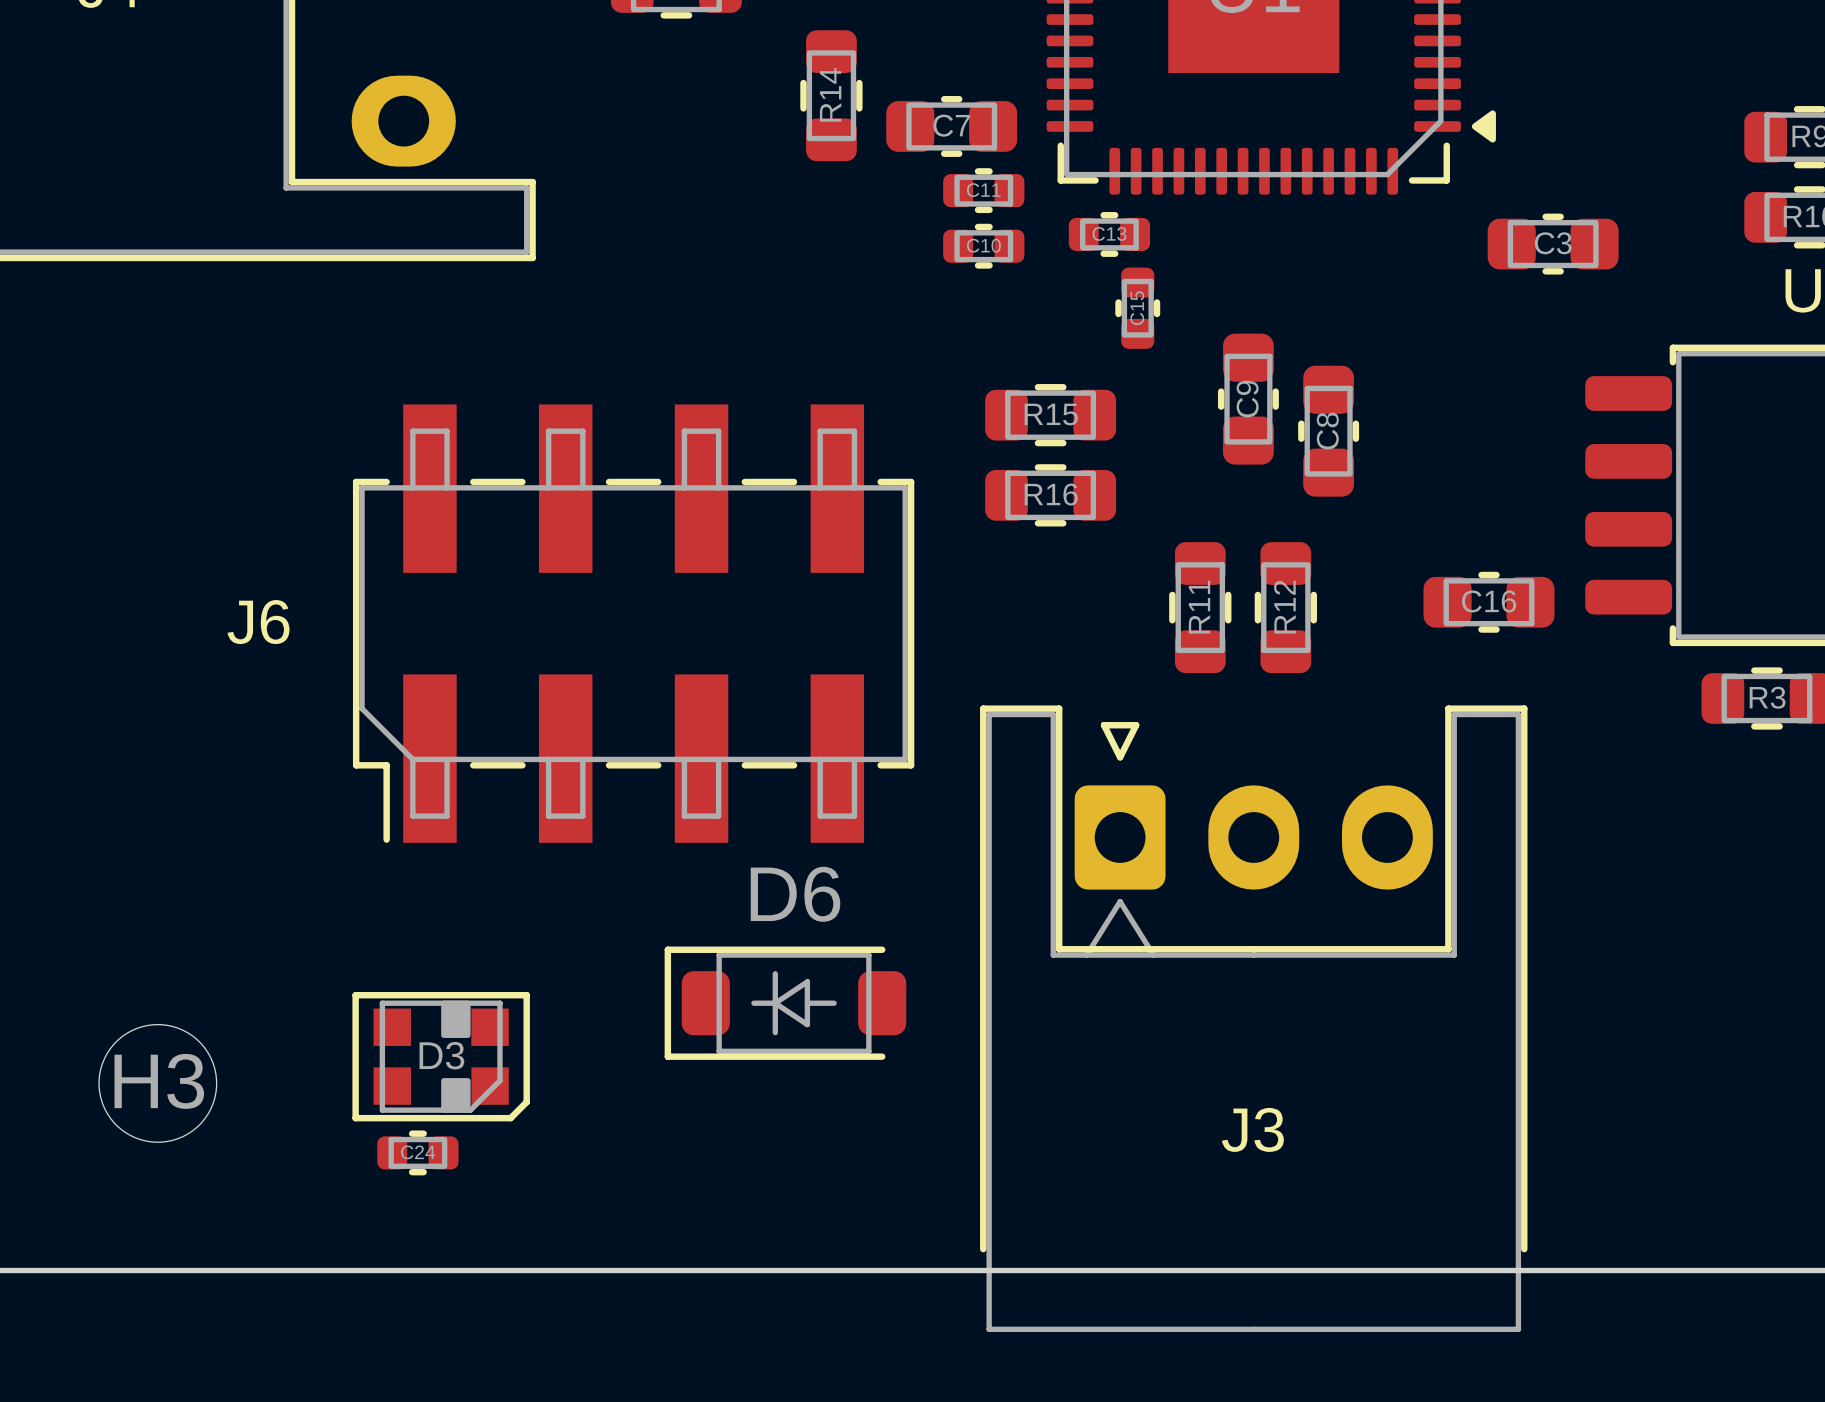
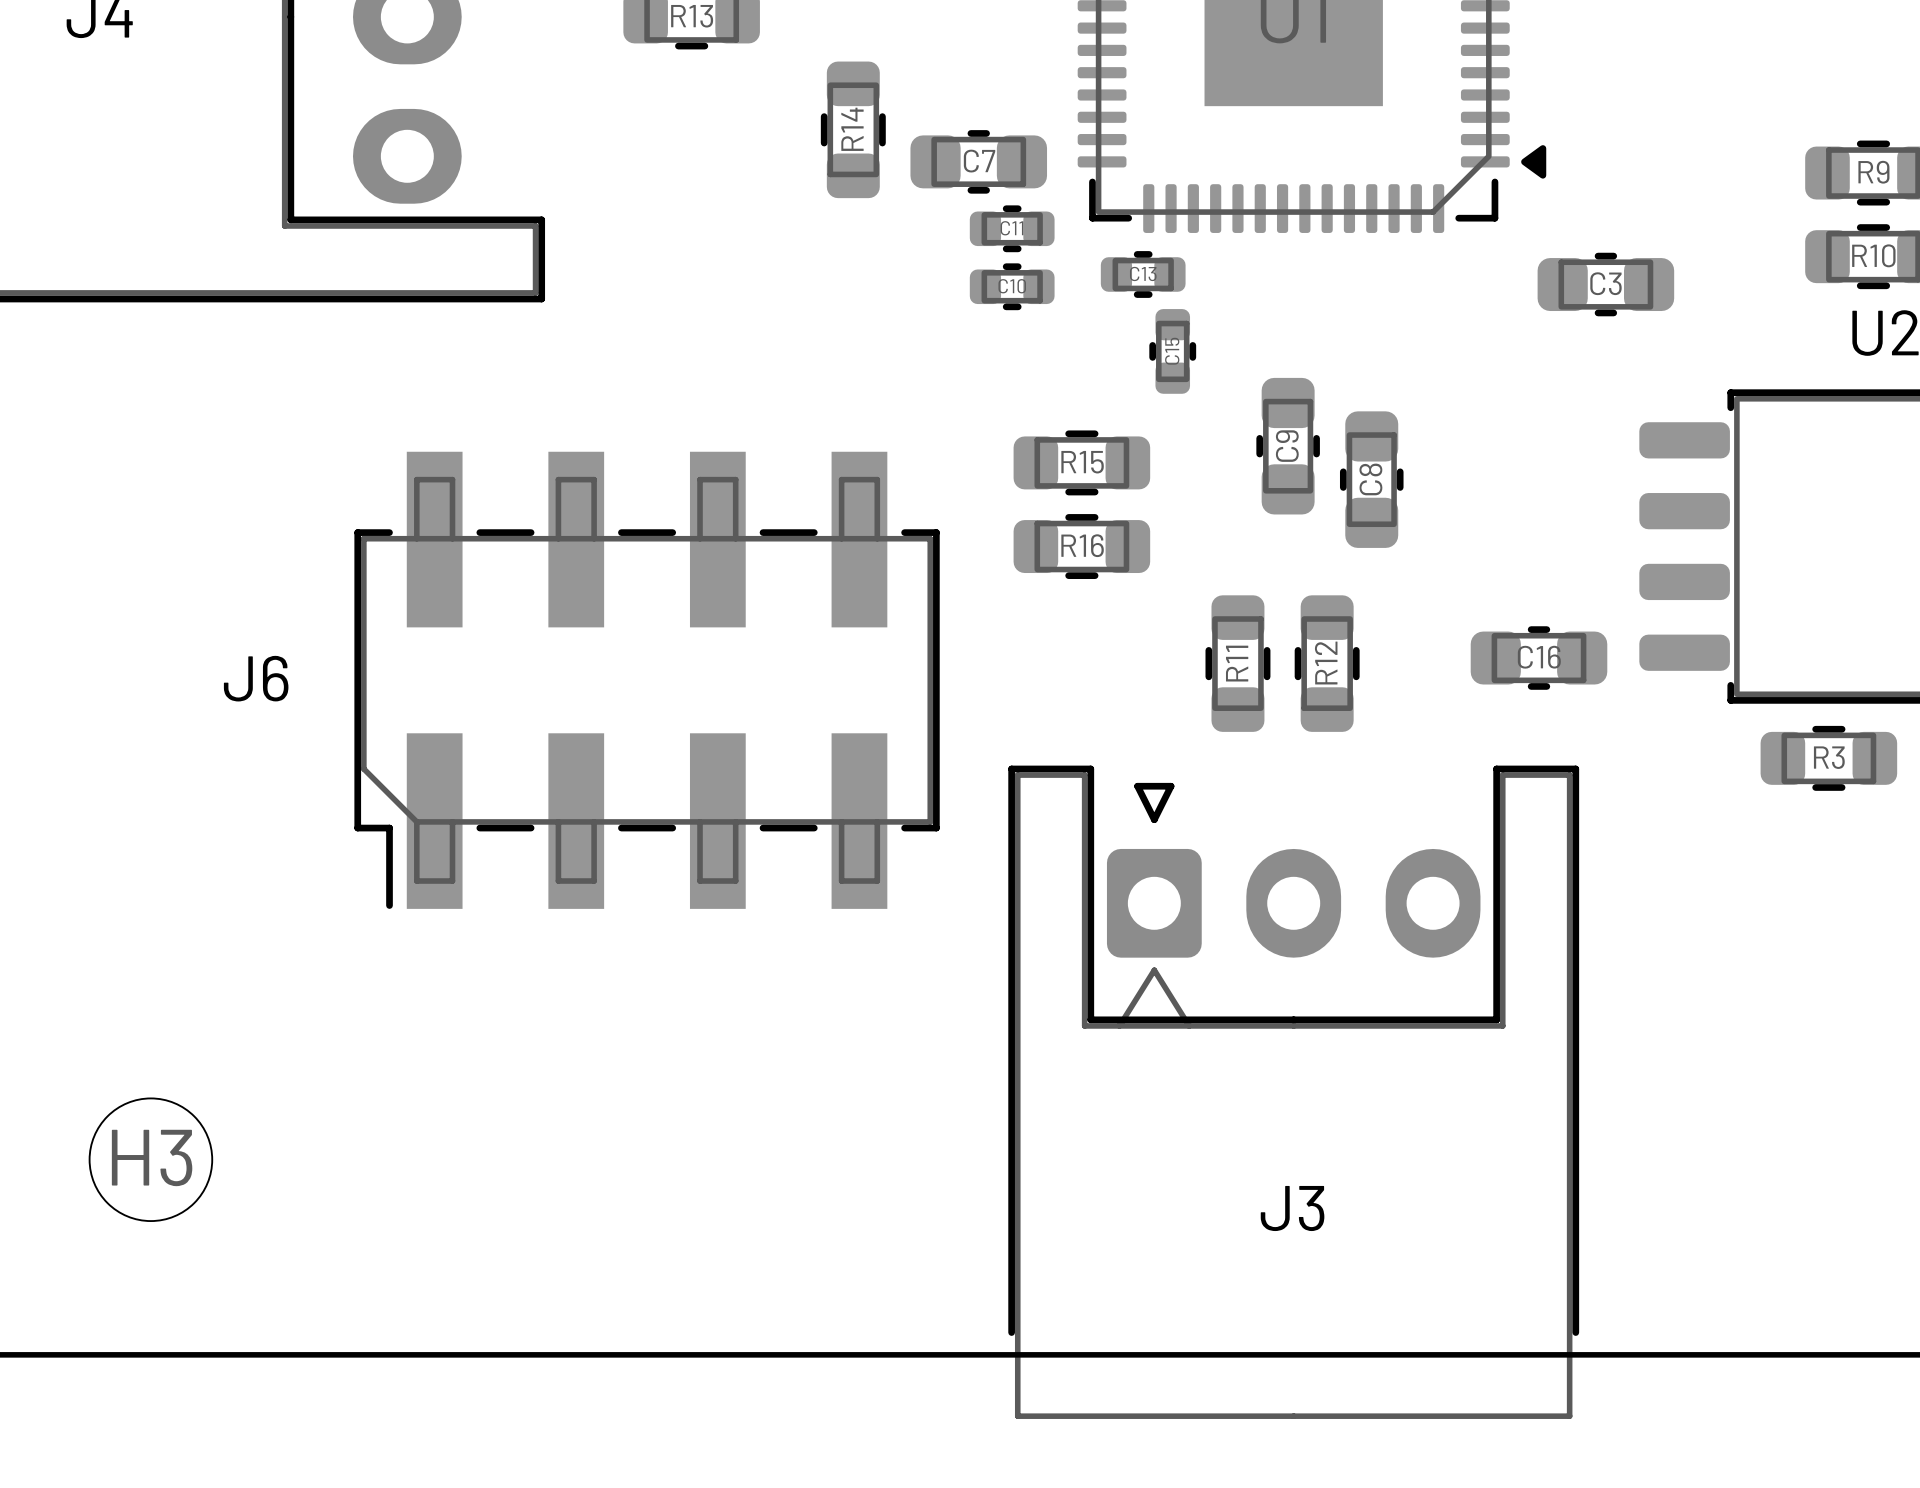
D6: (785, 1003) -> none
D3: (441, 1056) -> none
C24: (417, 1152) -> none

